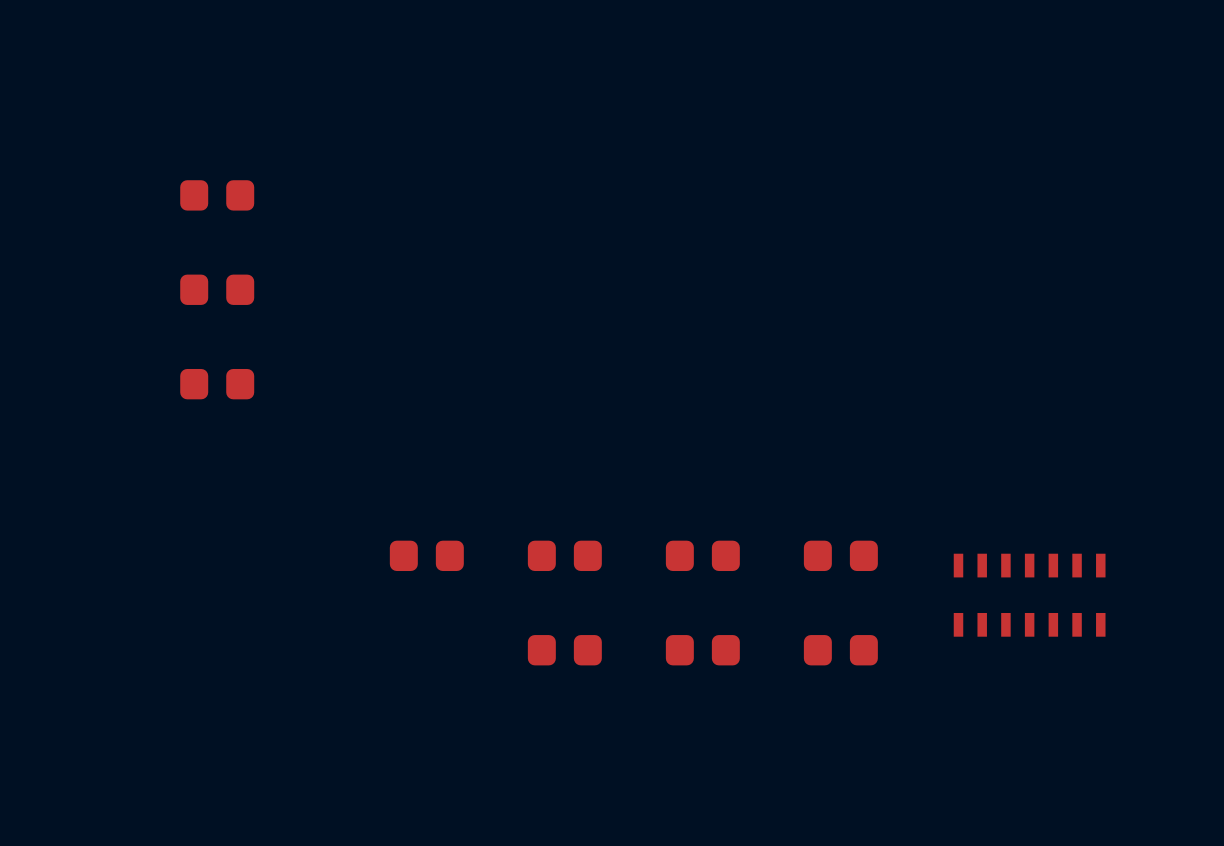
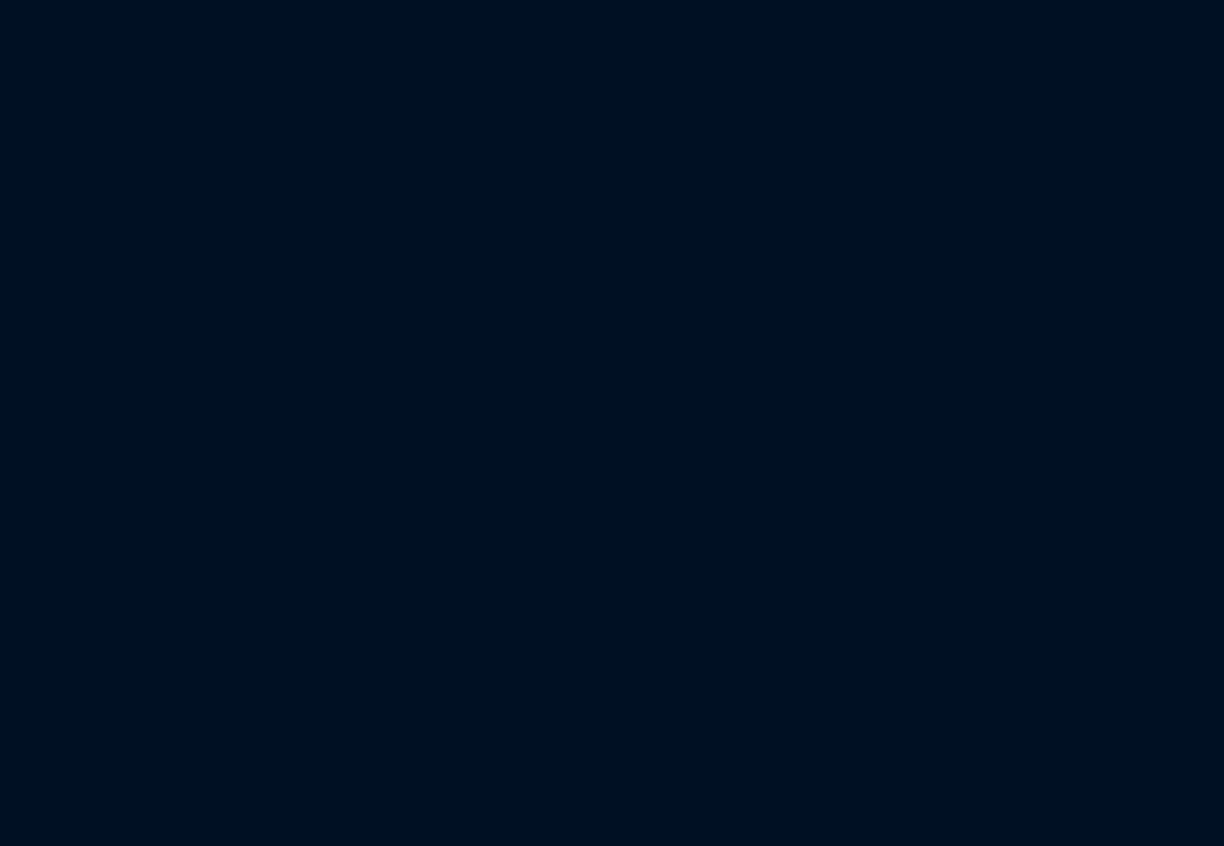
part: (217, 195) -> none
part: (217, 289) -> none
part: (217, 384) -> none
part: (426, 555) -> none
part: (564, 555) -> none
part: (702, 555) -> none
part: (840, 555) -> none
part: (1029, 595) -> none
part: (564, 650) -> none
part: (702, 650) -> none
part: (840, 650) -> none

